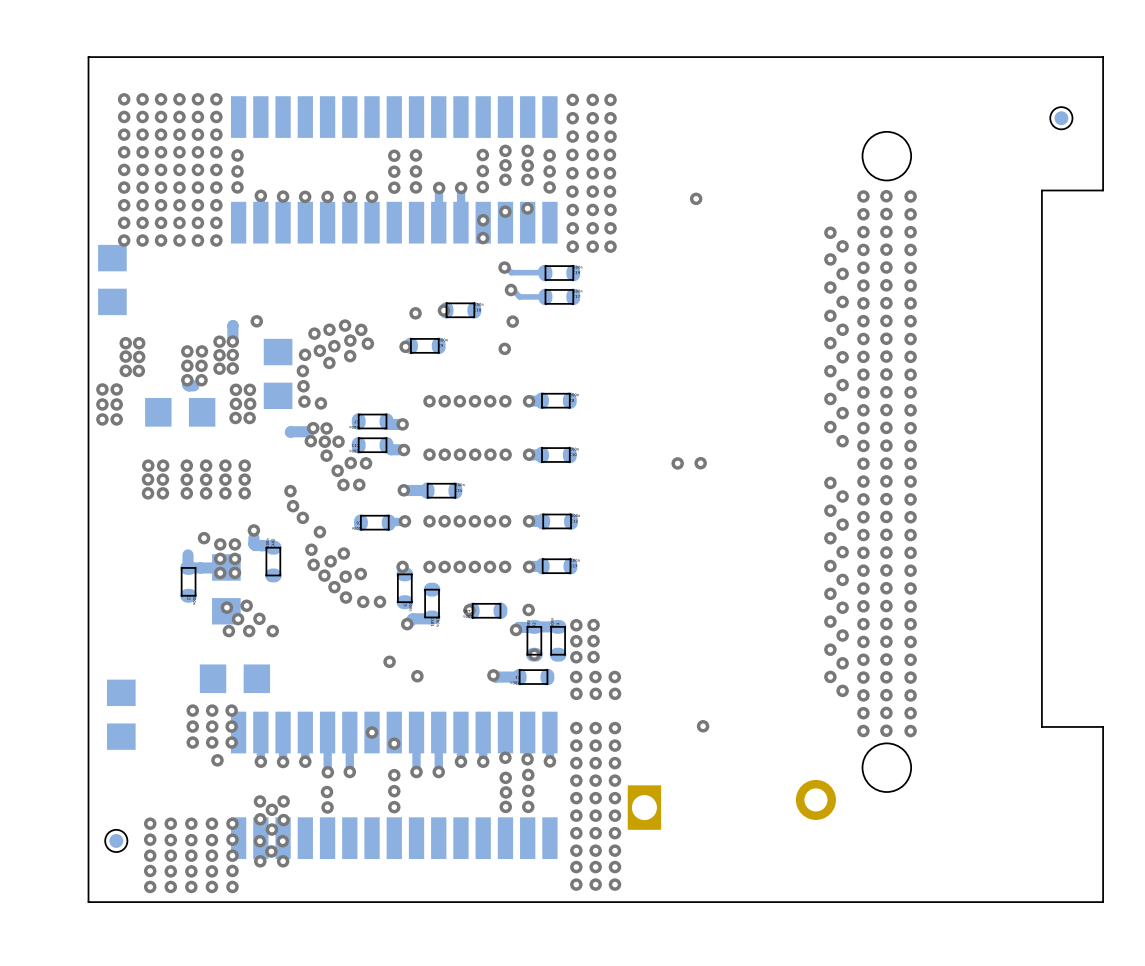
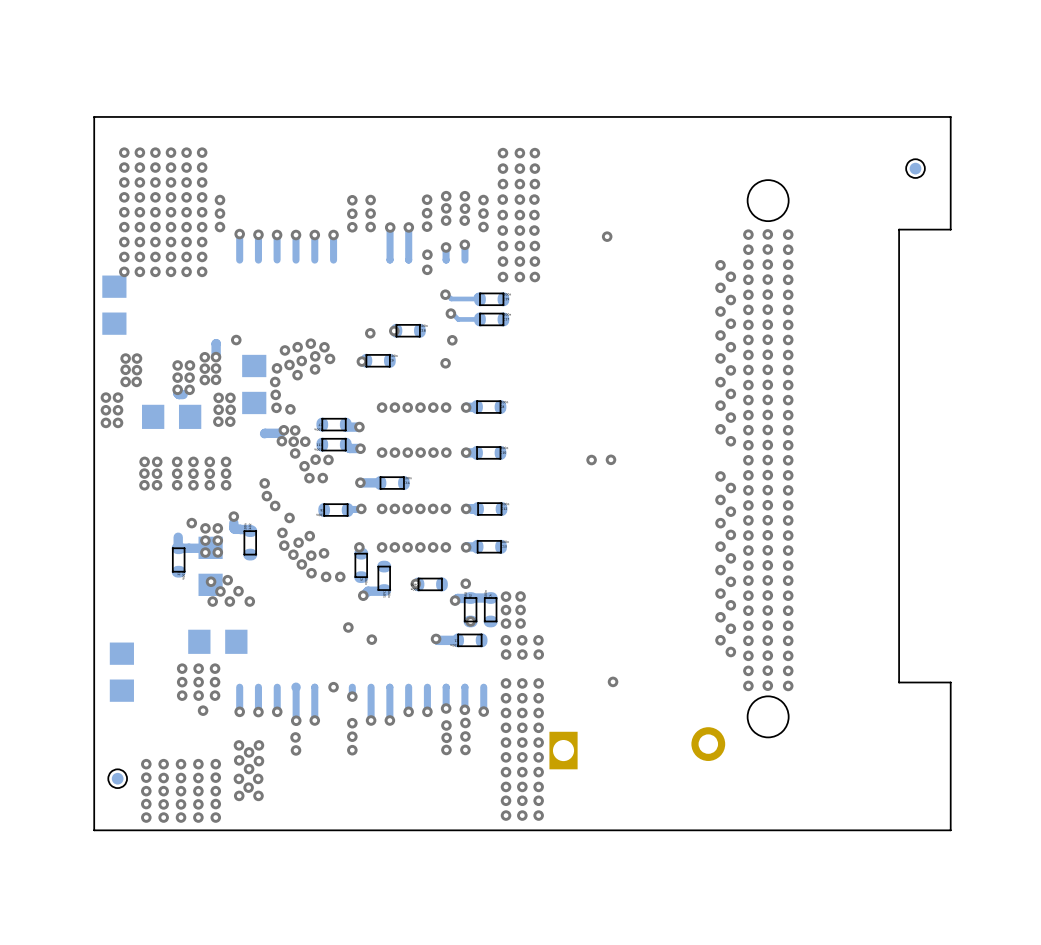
part: (394, 169) -> none
part: (394, 785) -> none

